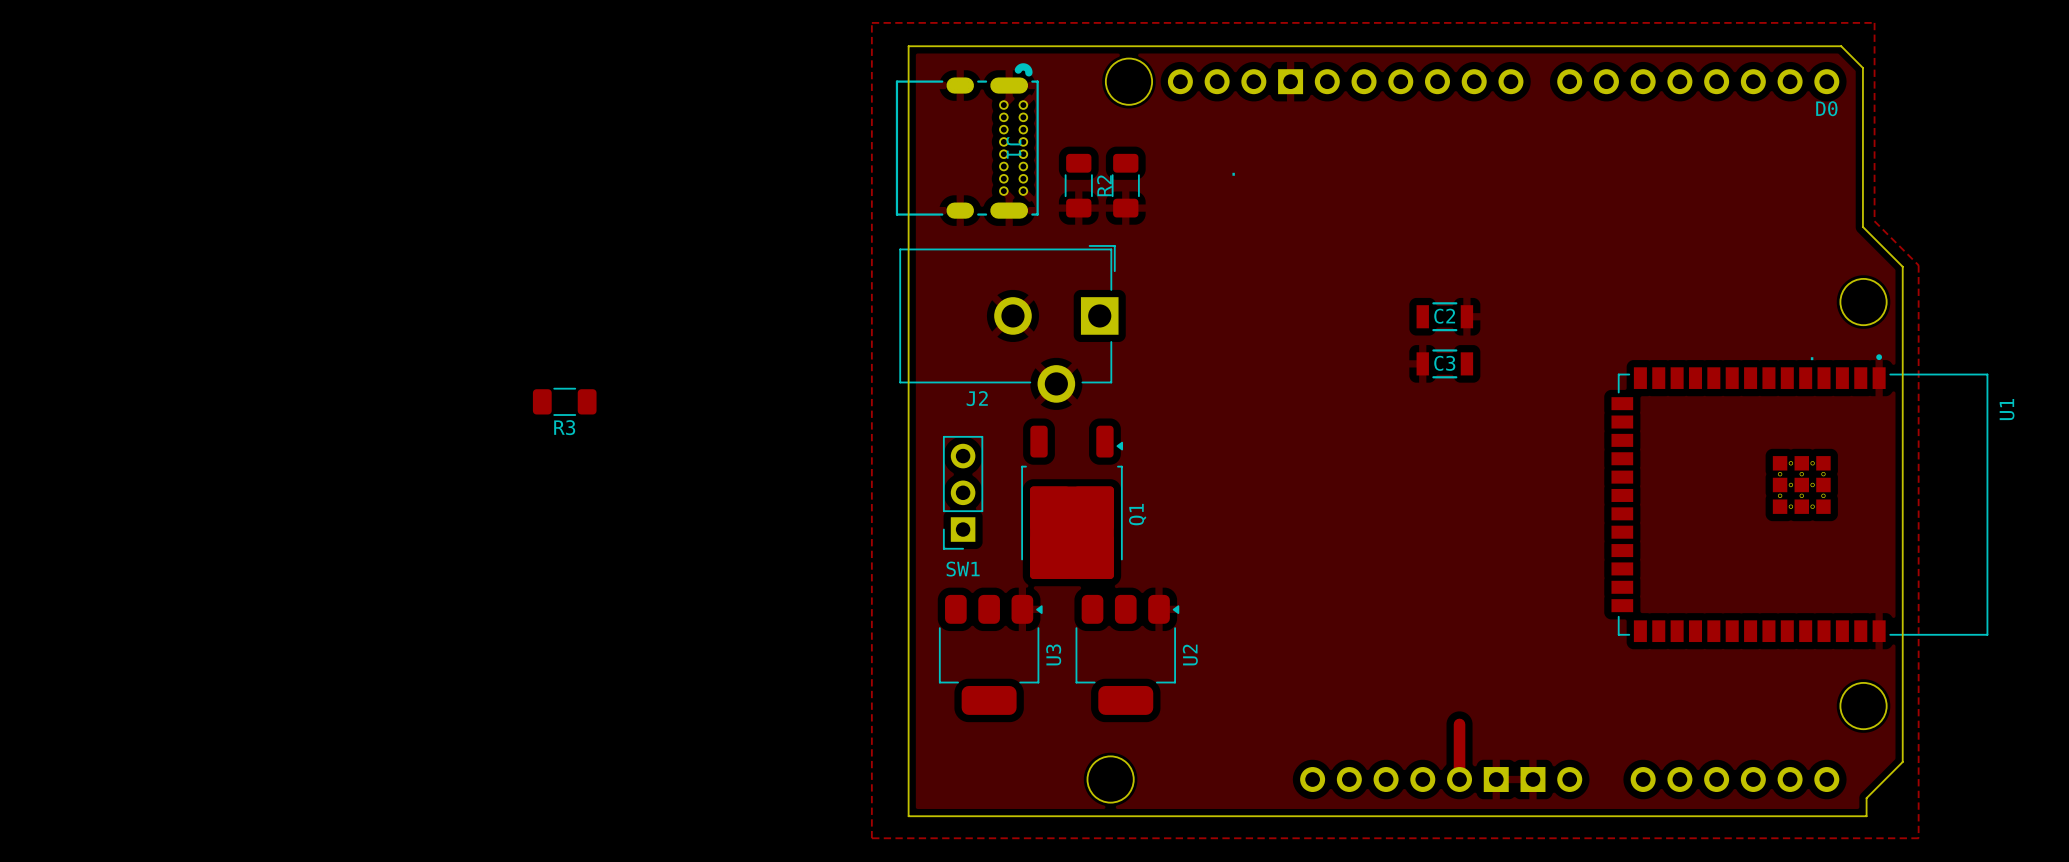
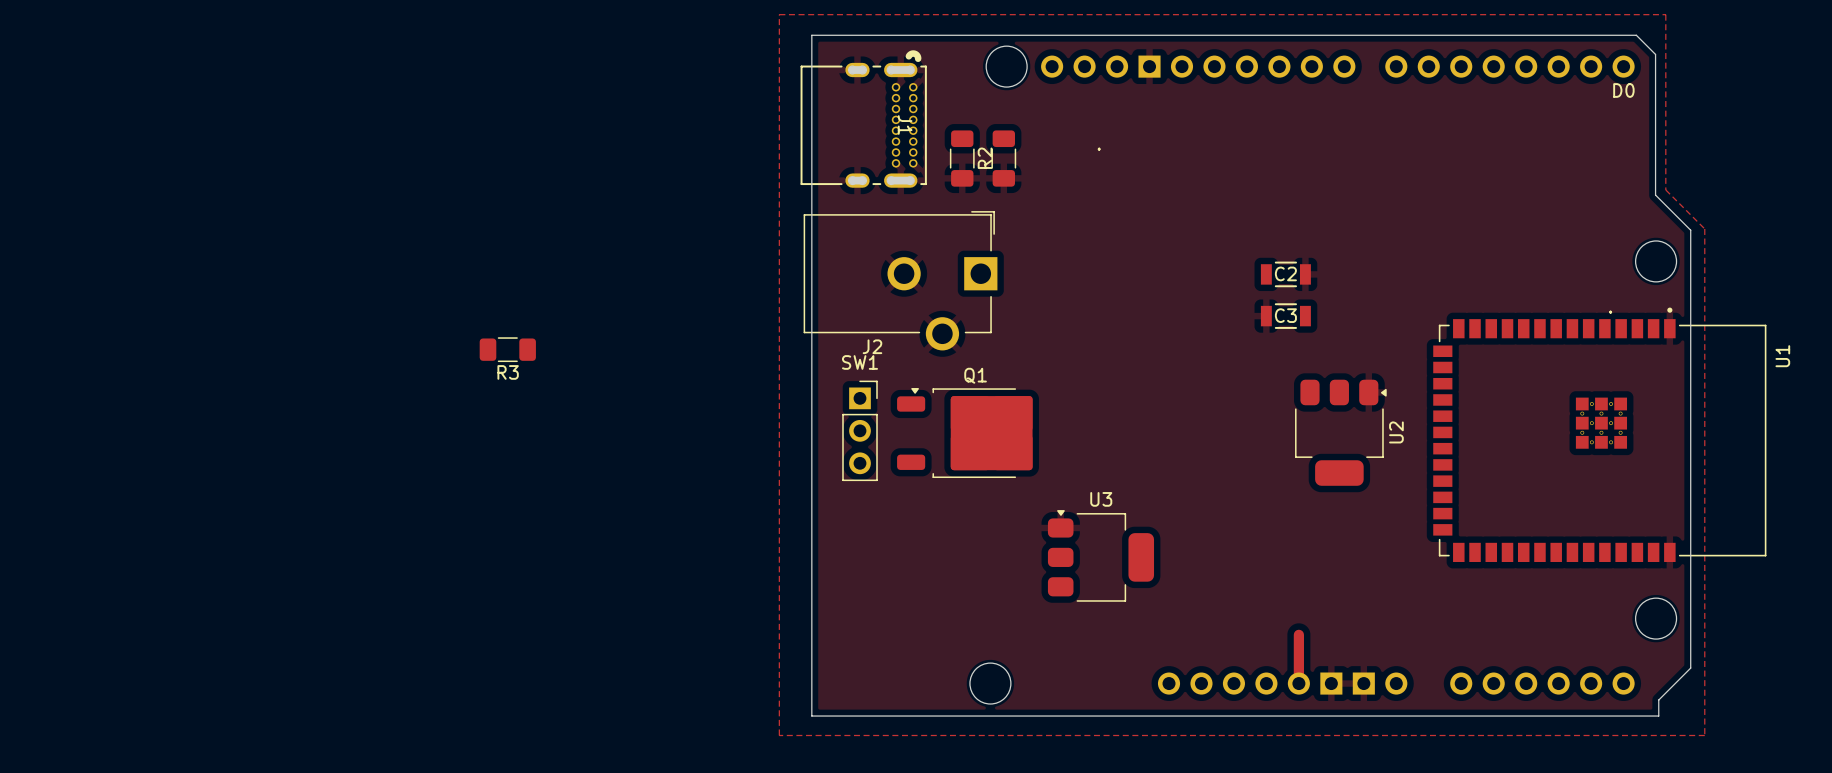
SW1 rotation: 0° (963, 492) -> 180° (860, 430)
Q1 rotation: 0° (1072, 502) -> 90° counterclockwise (964, 433)
U3 rotation: 0° (990, 654) -> 90° counterclockwise (1100, 555)
U3 position: (990, 654) -> (1100, 555)
U2 position: (1127, 654) -> (1340, 432)

